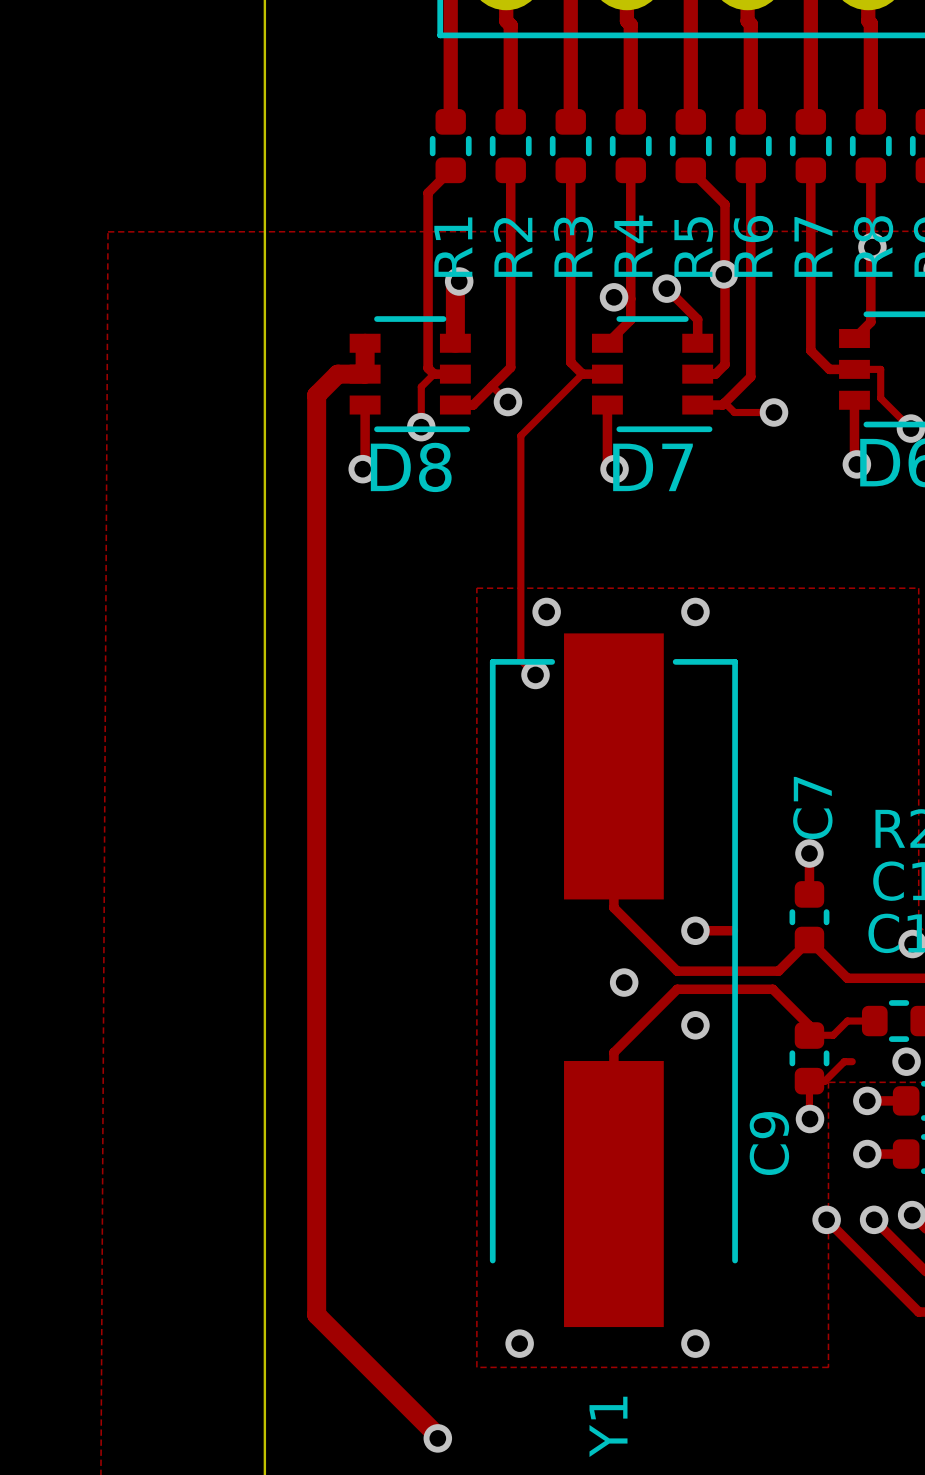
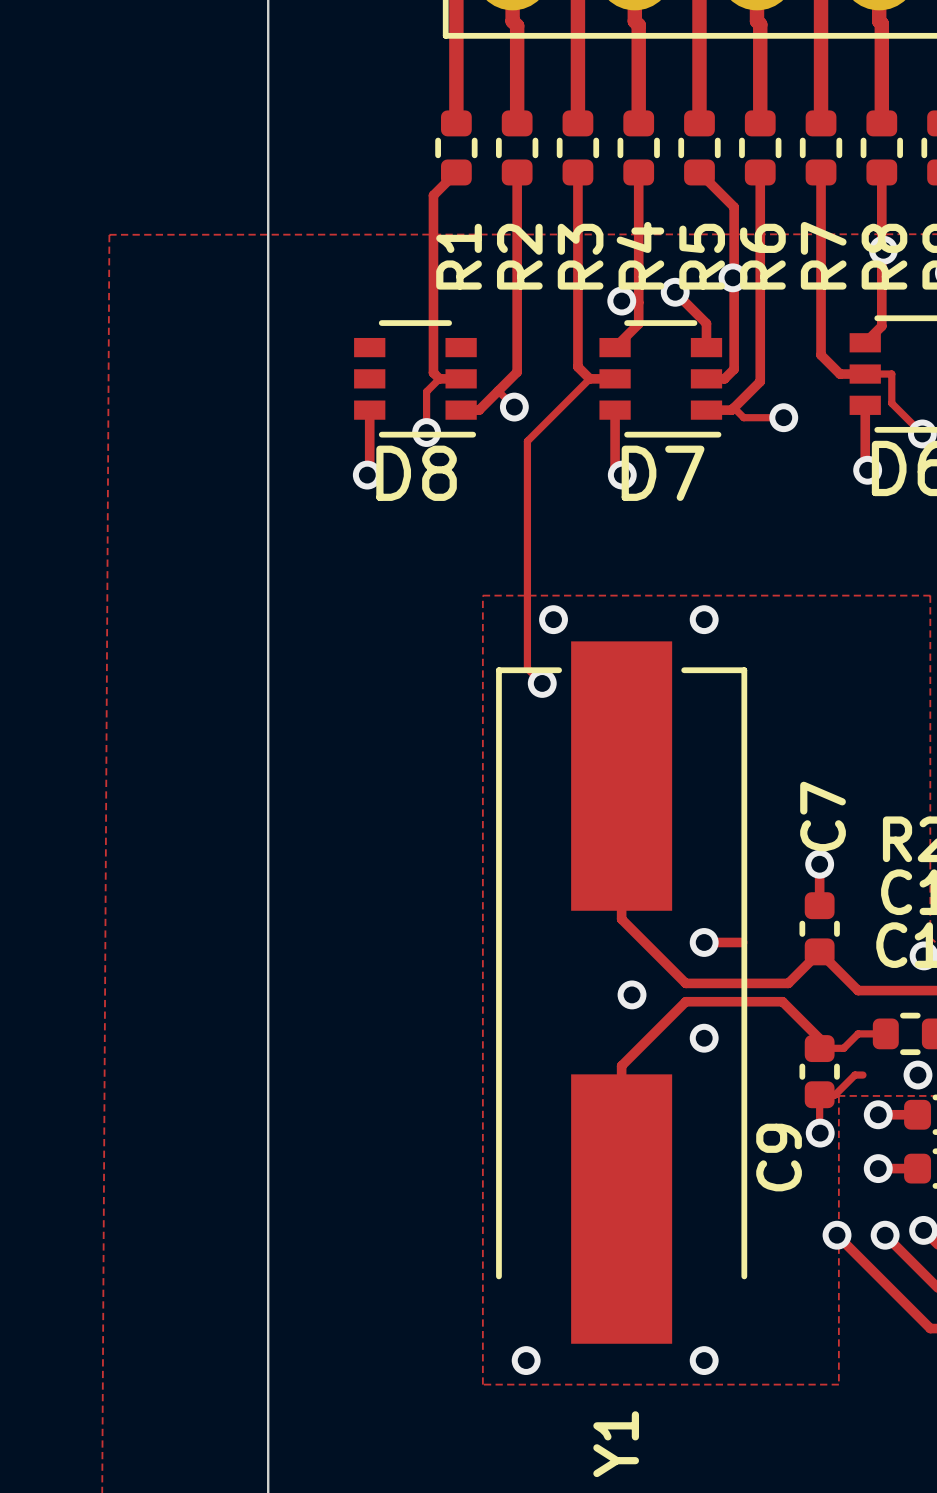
track: (459, 281) (455, 285) (455, 343) -> none
via: (459, 281) -> none
track: (365, 343) (365, 374) (337, 374) (316, 395) (316, 1314) (437, 1436) (437, 1438) -> none
via: (437, 1438) -> none

